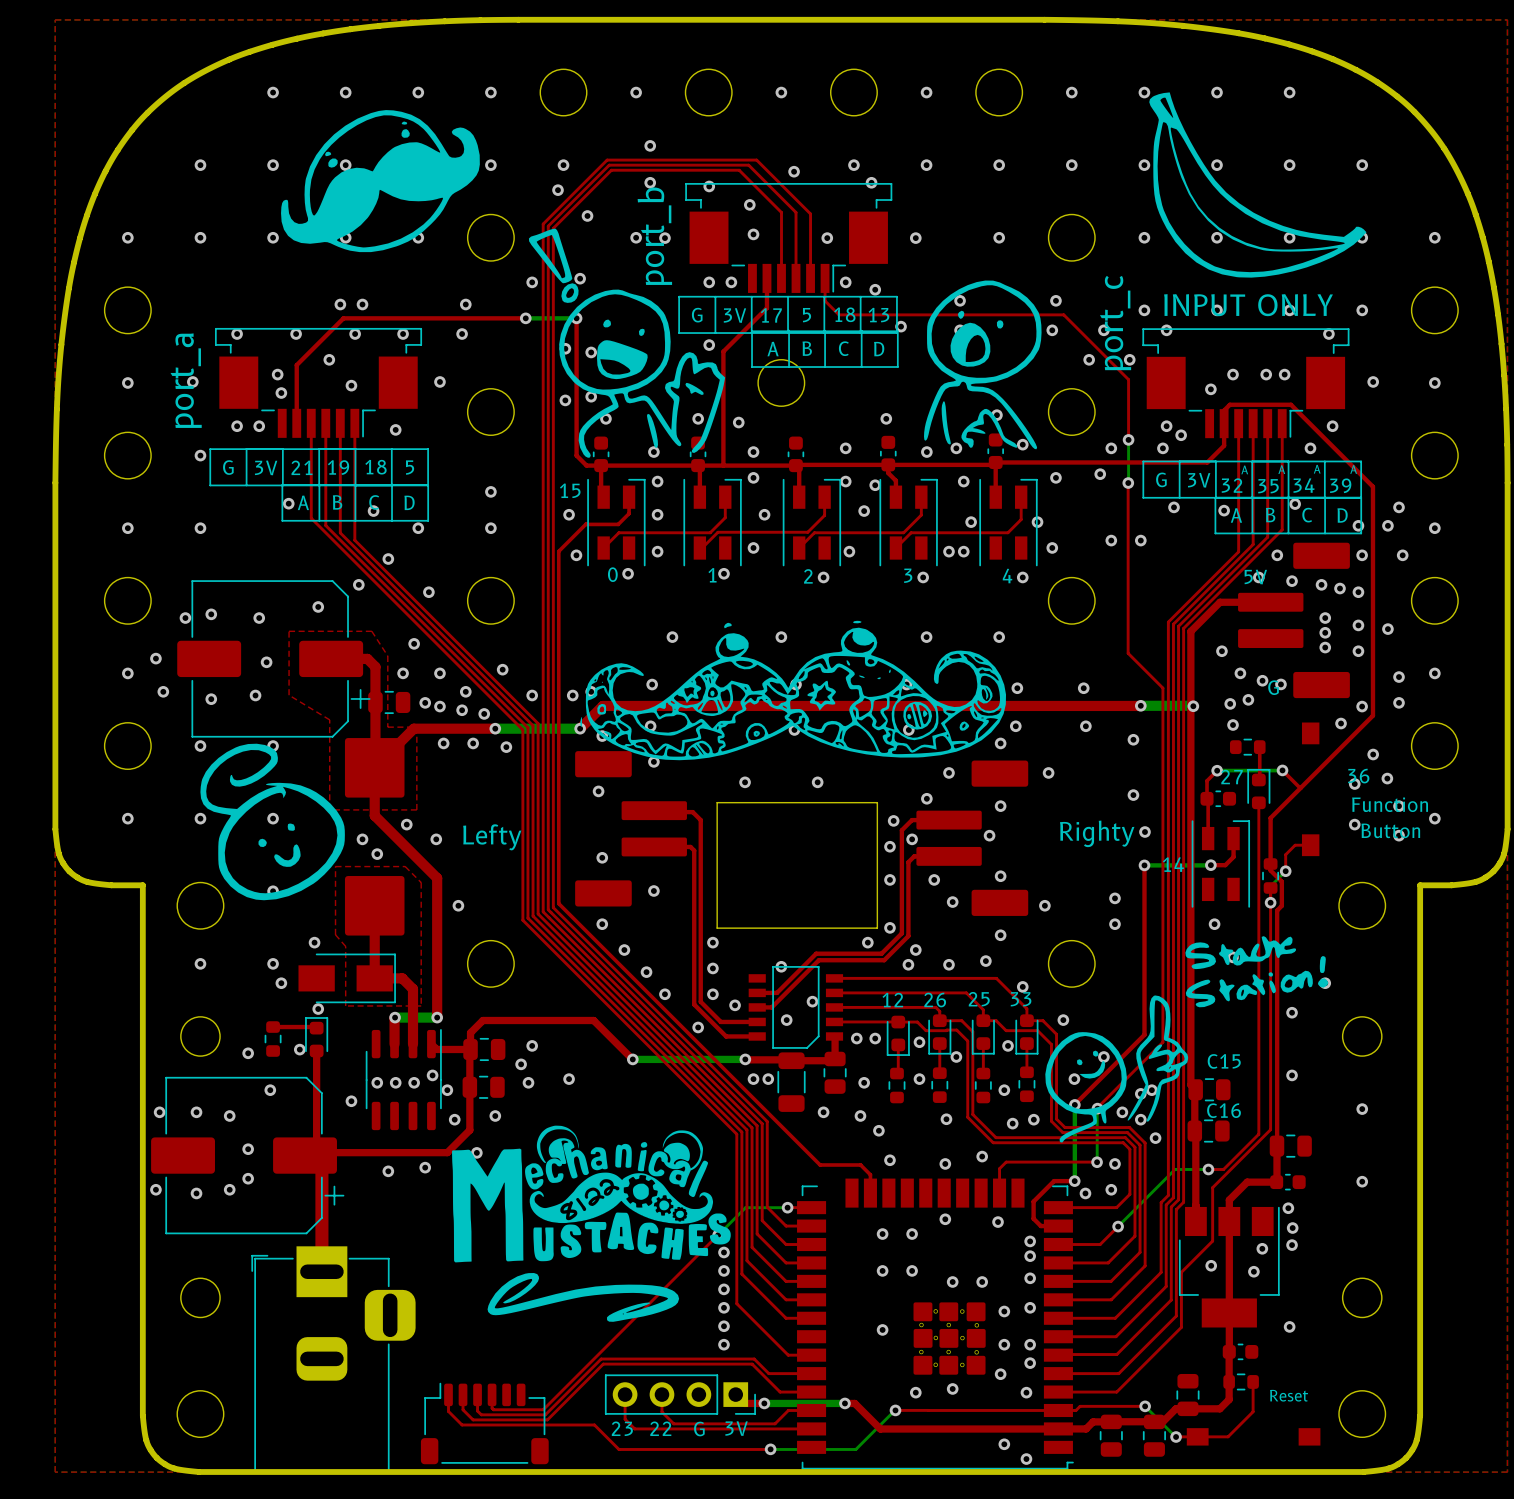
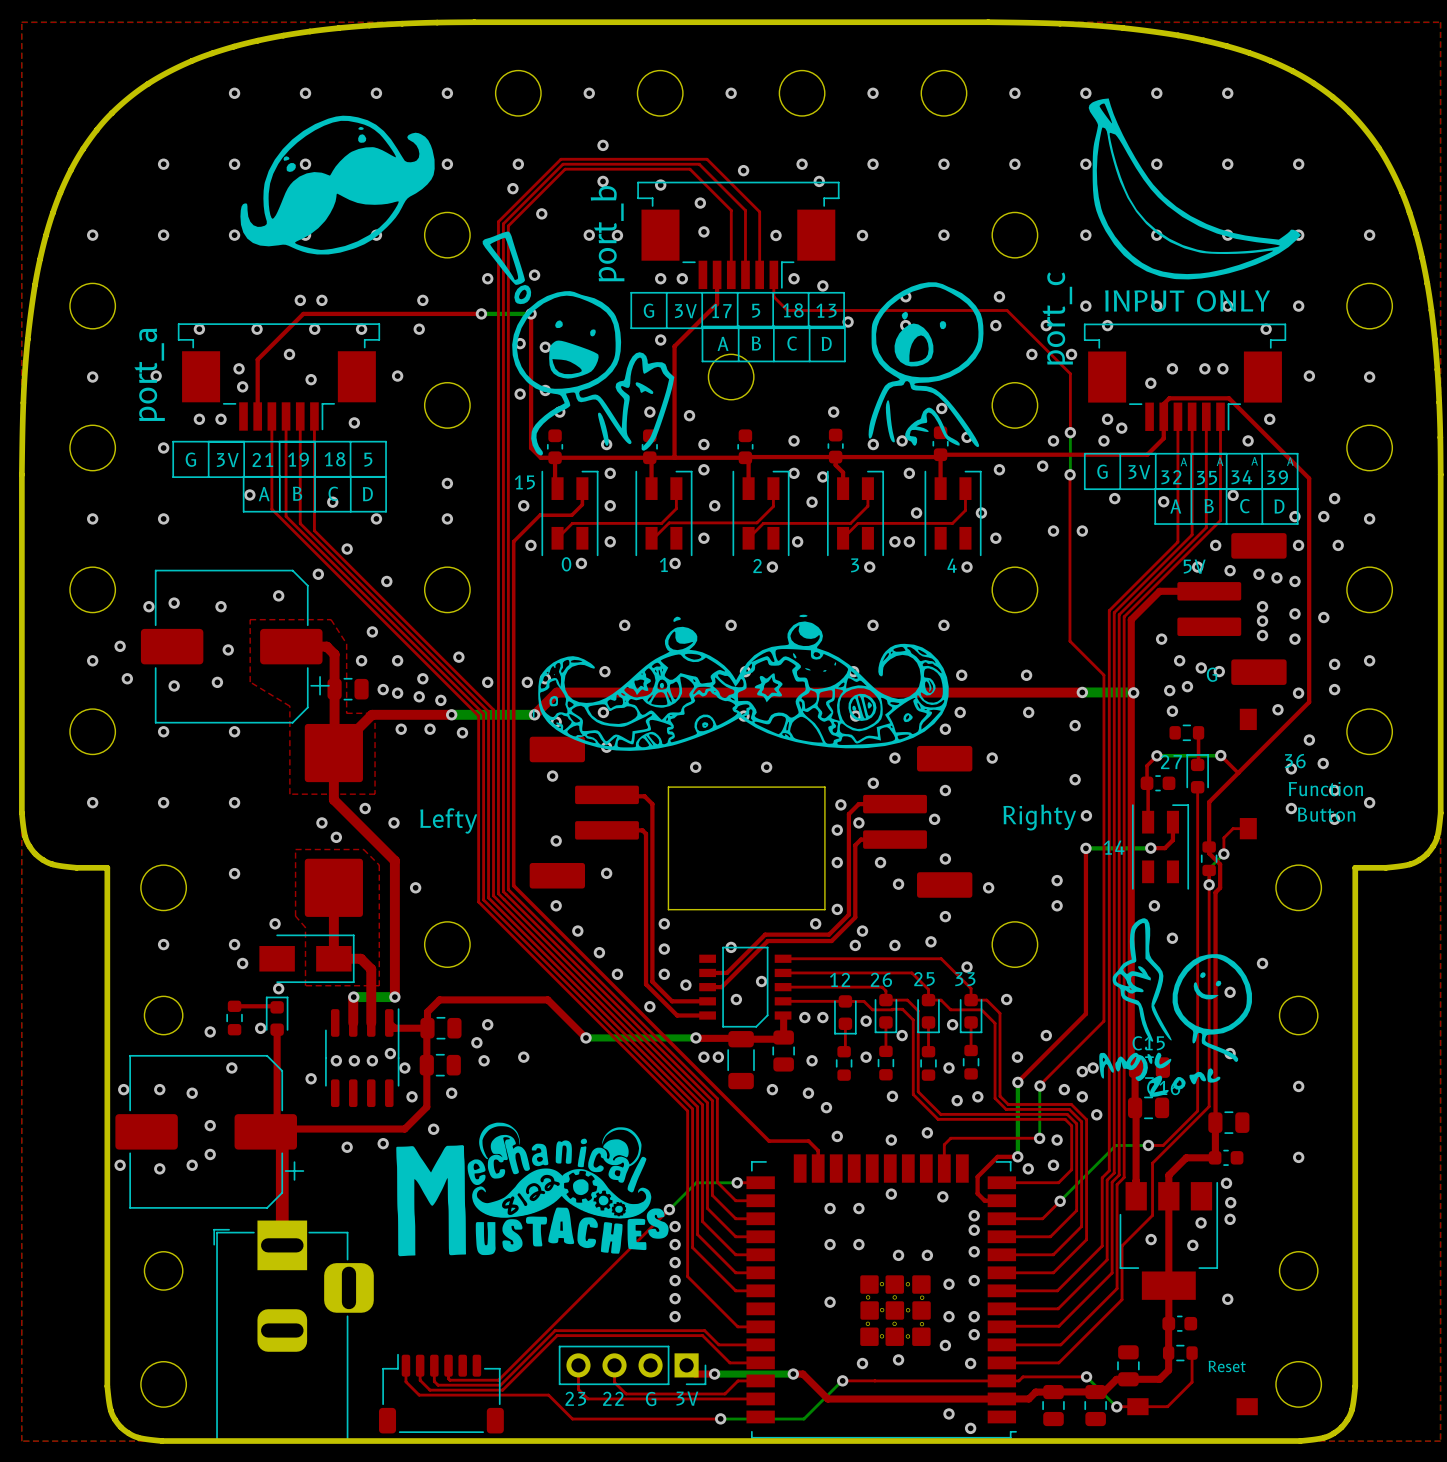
drawing shape: [281, 92, 1367, 1143] -> [240, 98, 1301, 1097]
drawing: [200, 743, 345, 901] -> none
drawing: [1185, 936, 1329, 1008] -> none
C15 name position: C15 (1224, 1061) -> C15 (1148, 1043)
drawing position: (591, 1194) -> (532, 1189)
drawing: [487, 1273, 680, 1322] -> none

